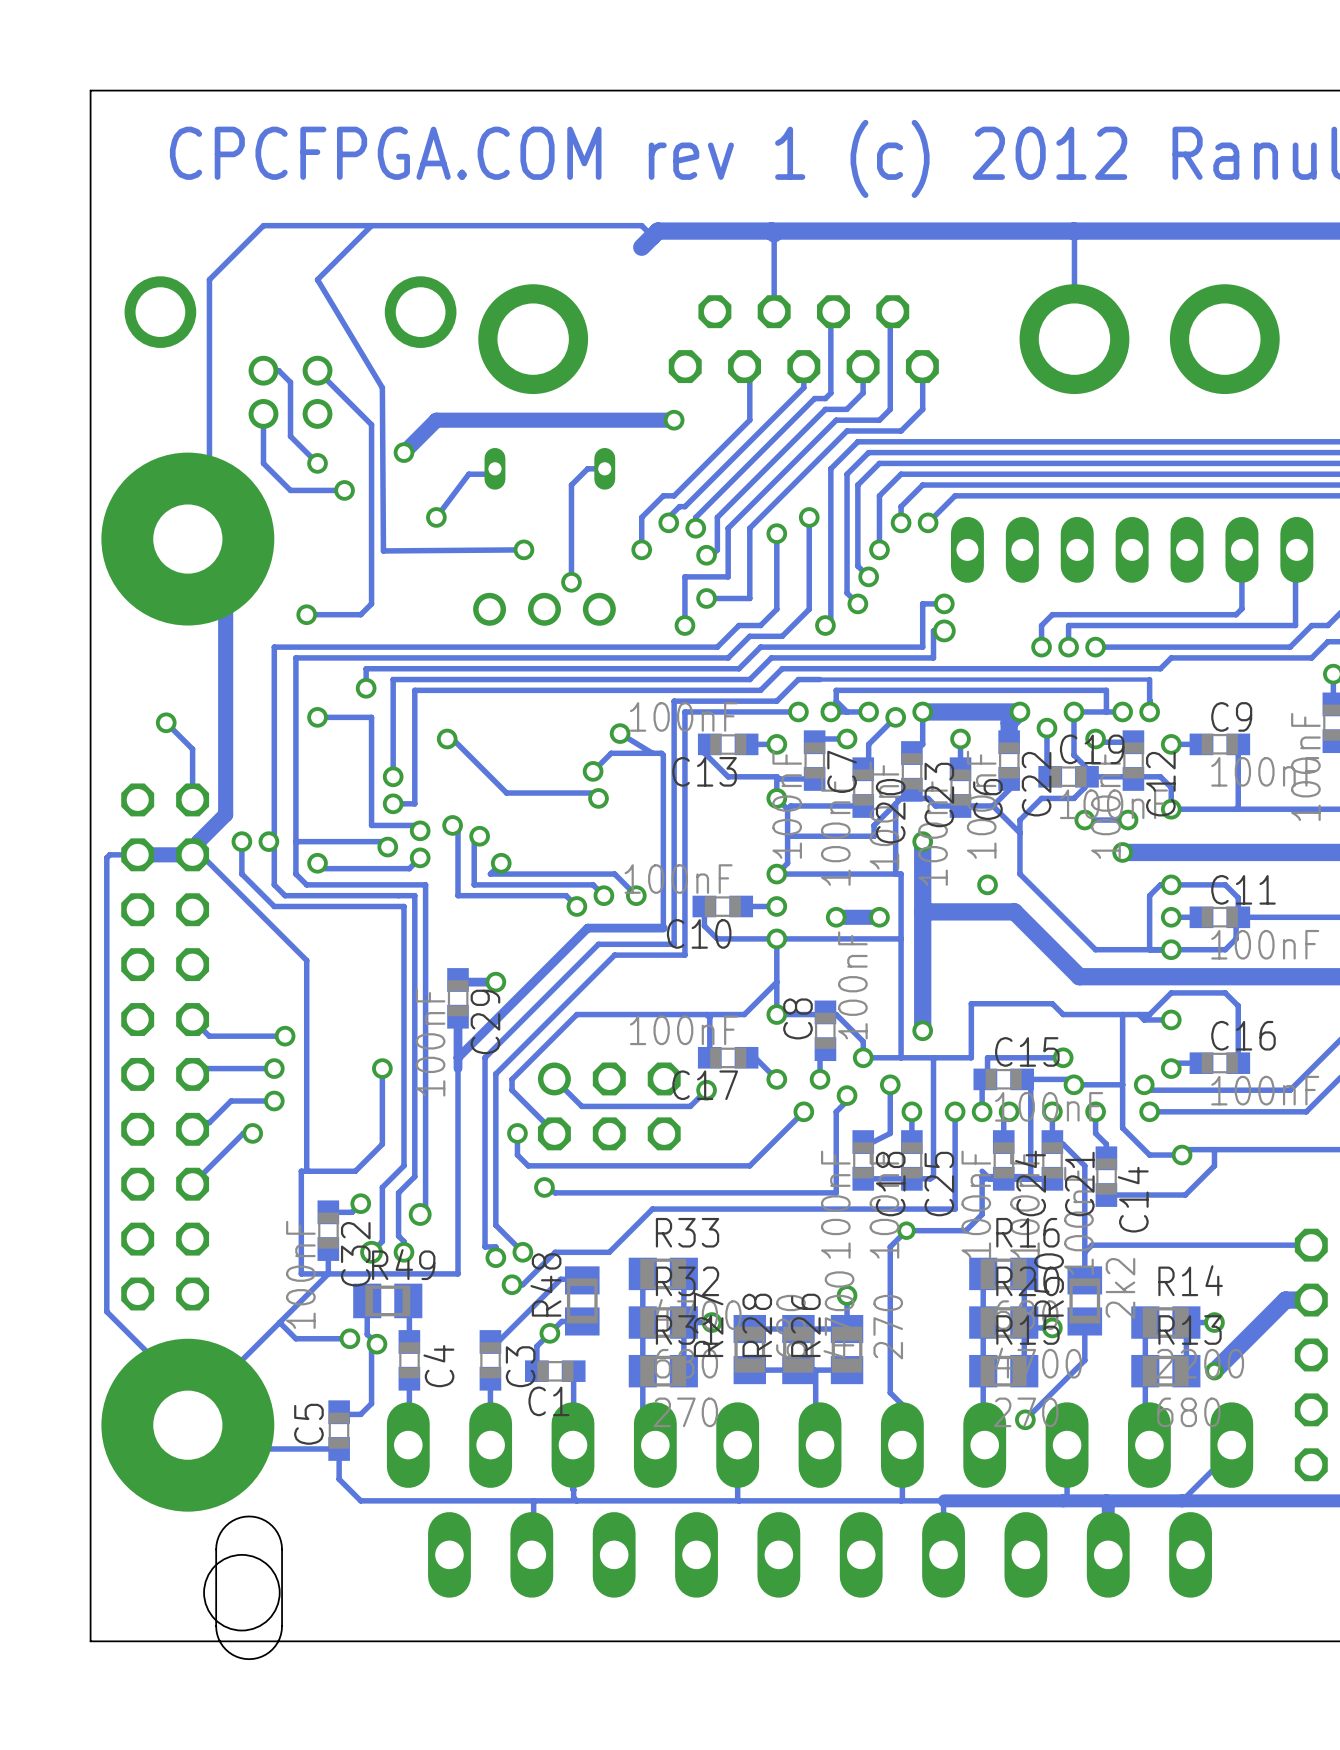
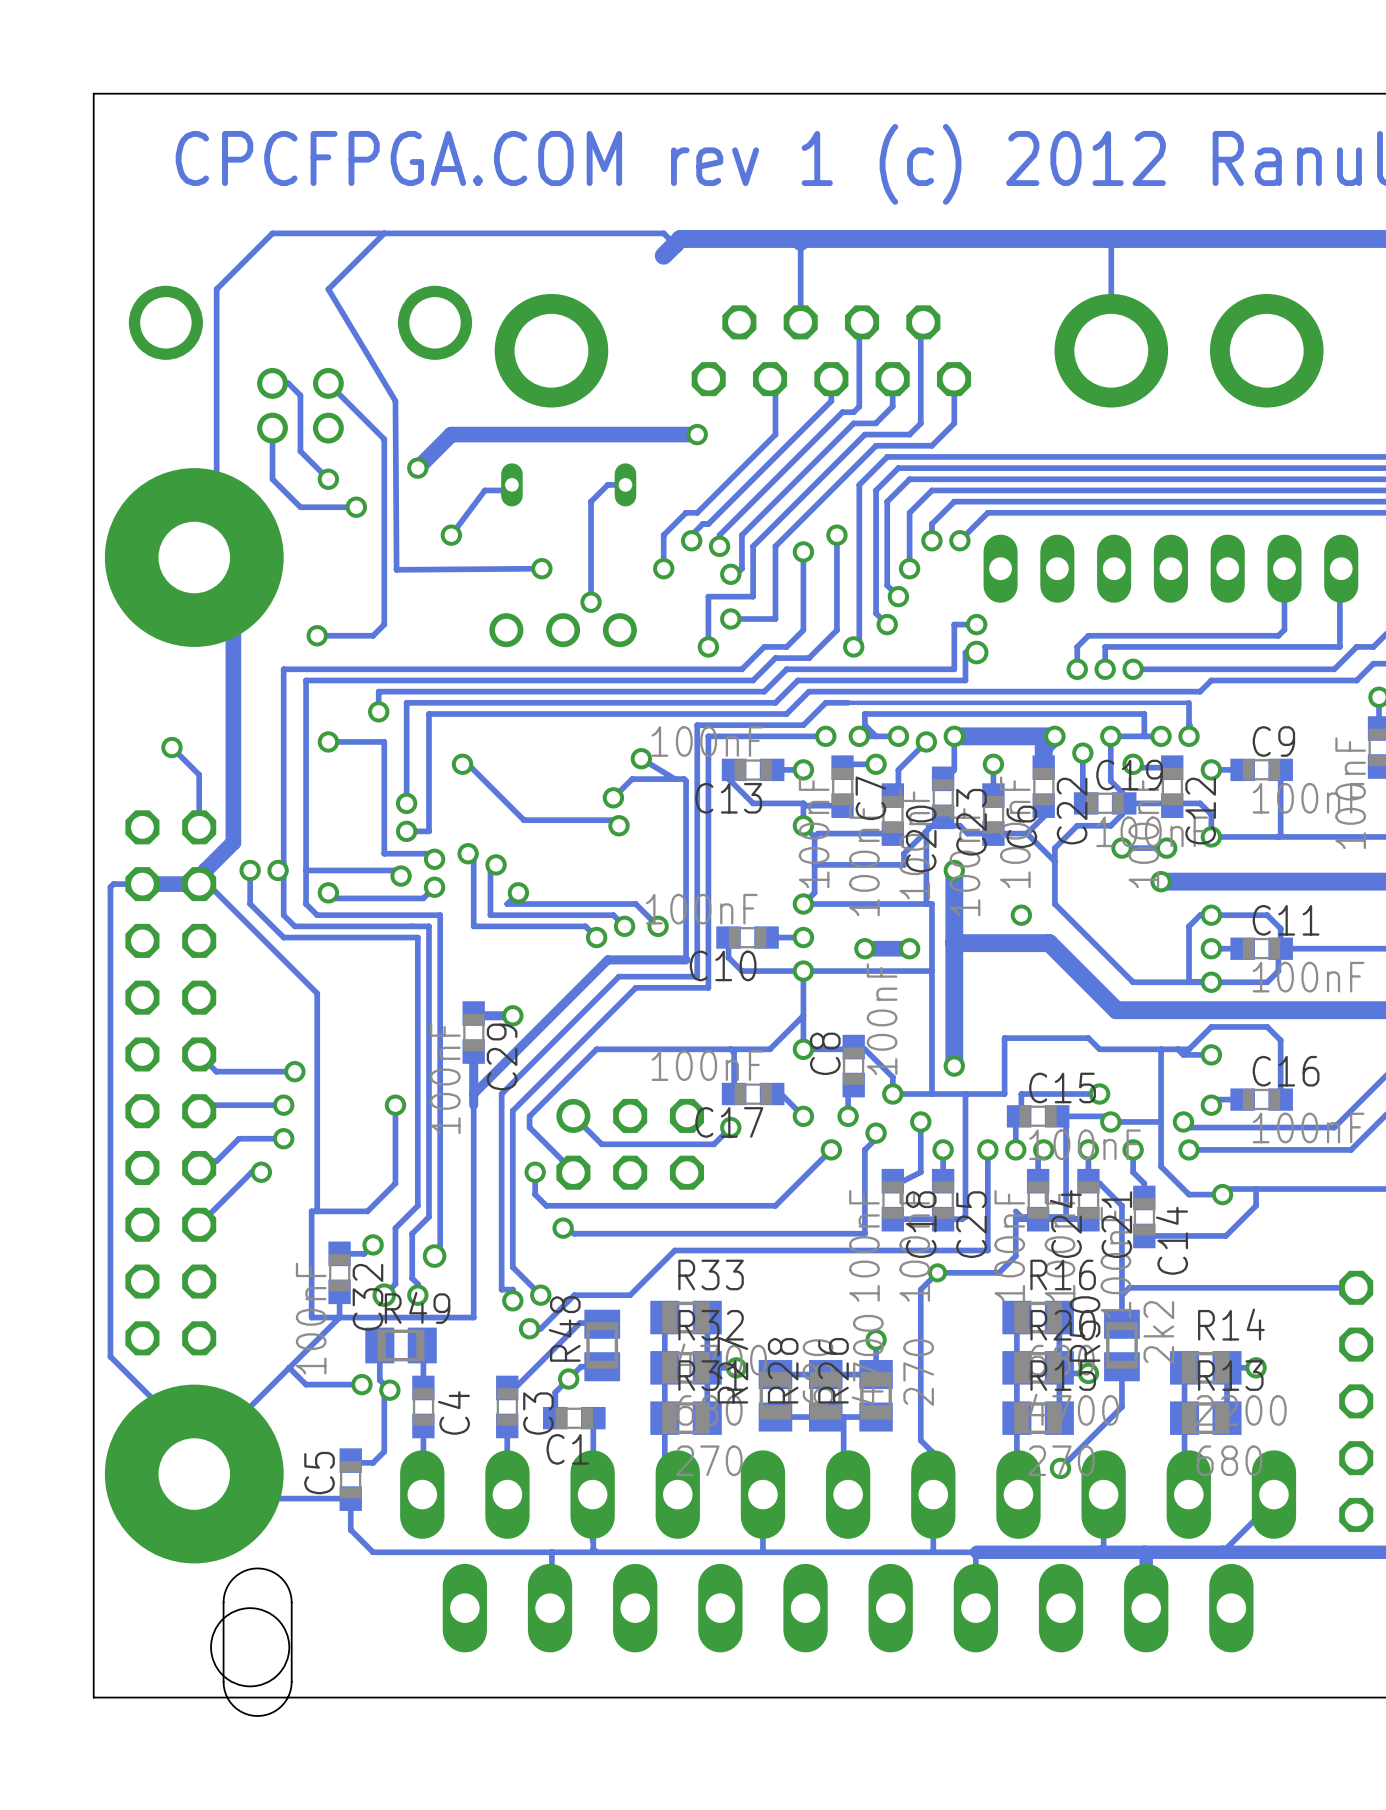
track: (1311, 1300) (1285, 1300) (1214, 1371) -> none
via: (1214, 1371) -> none

